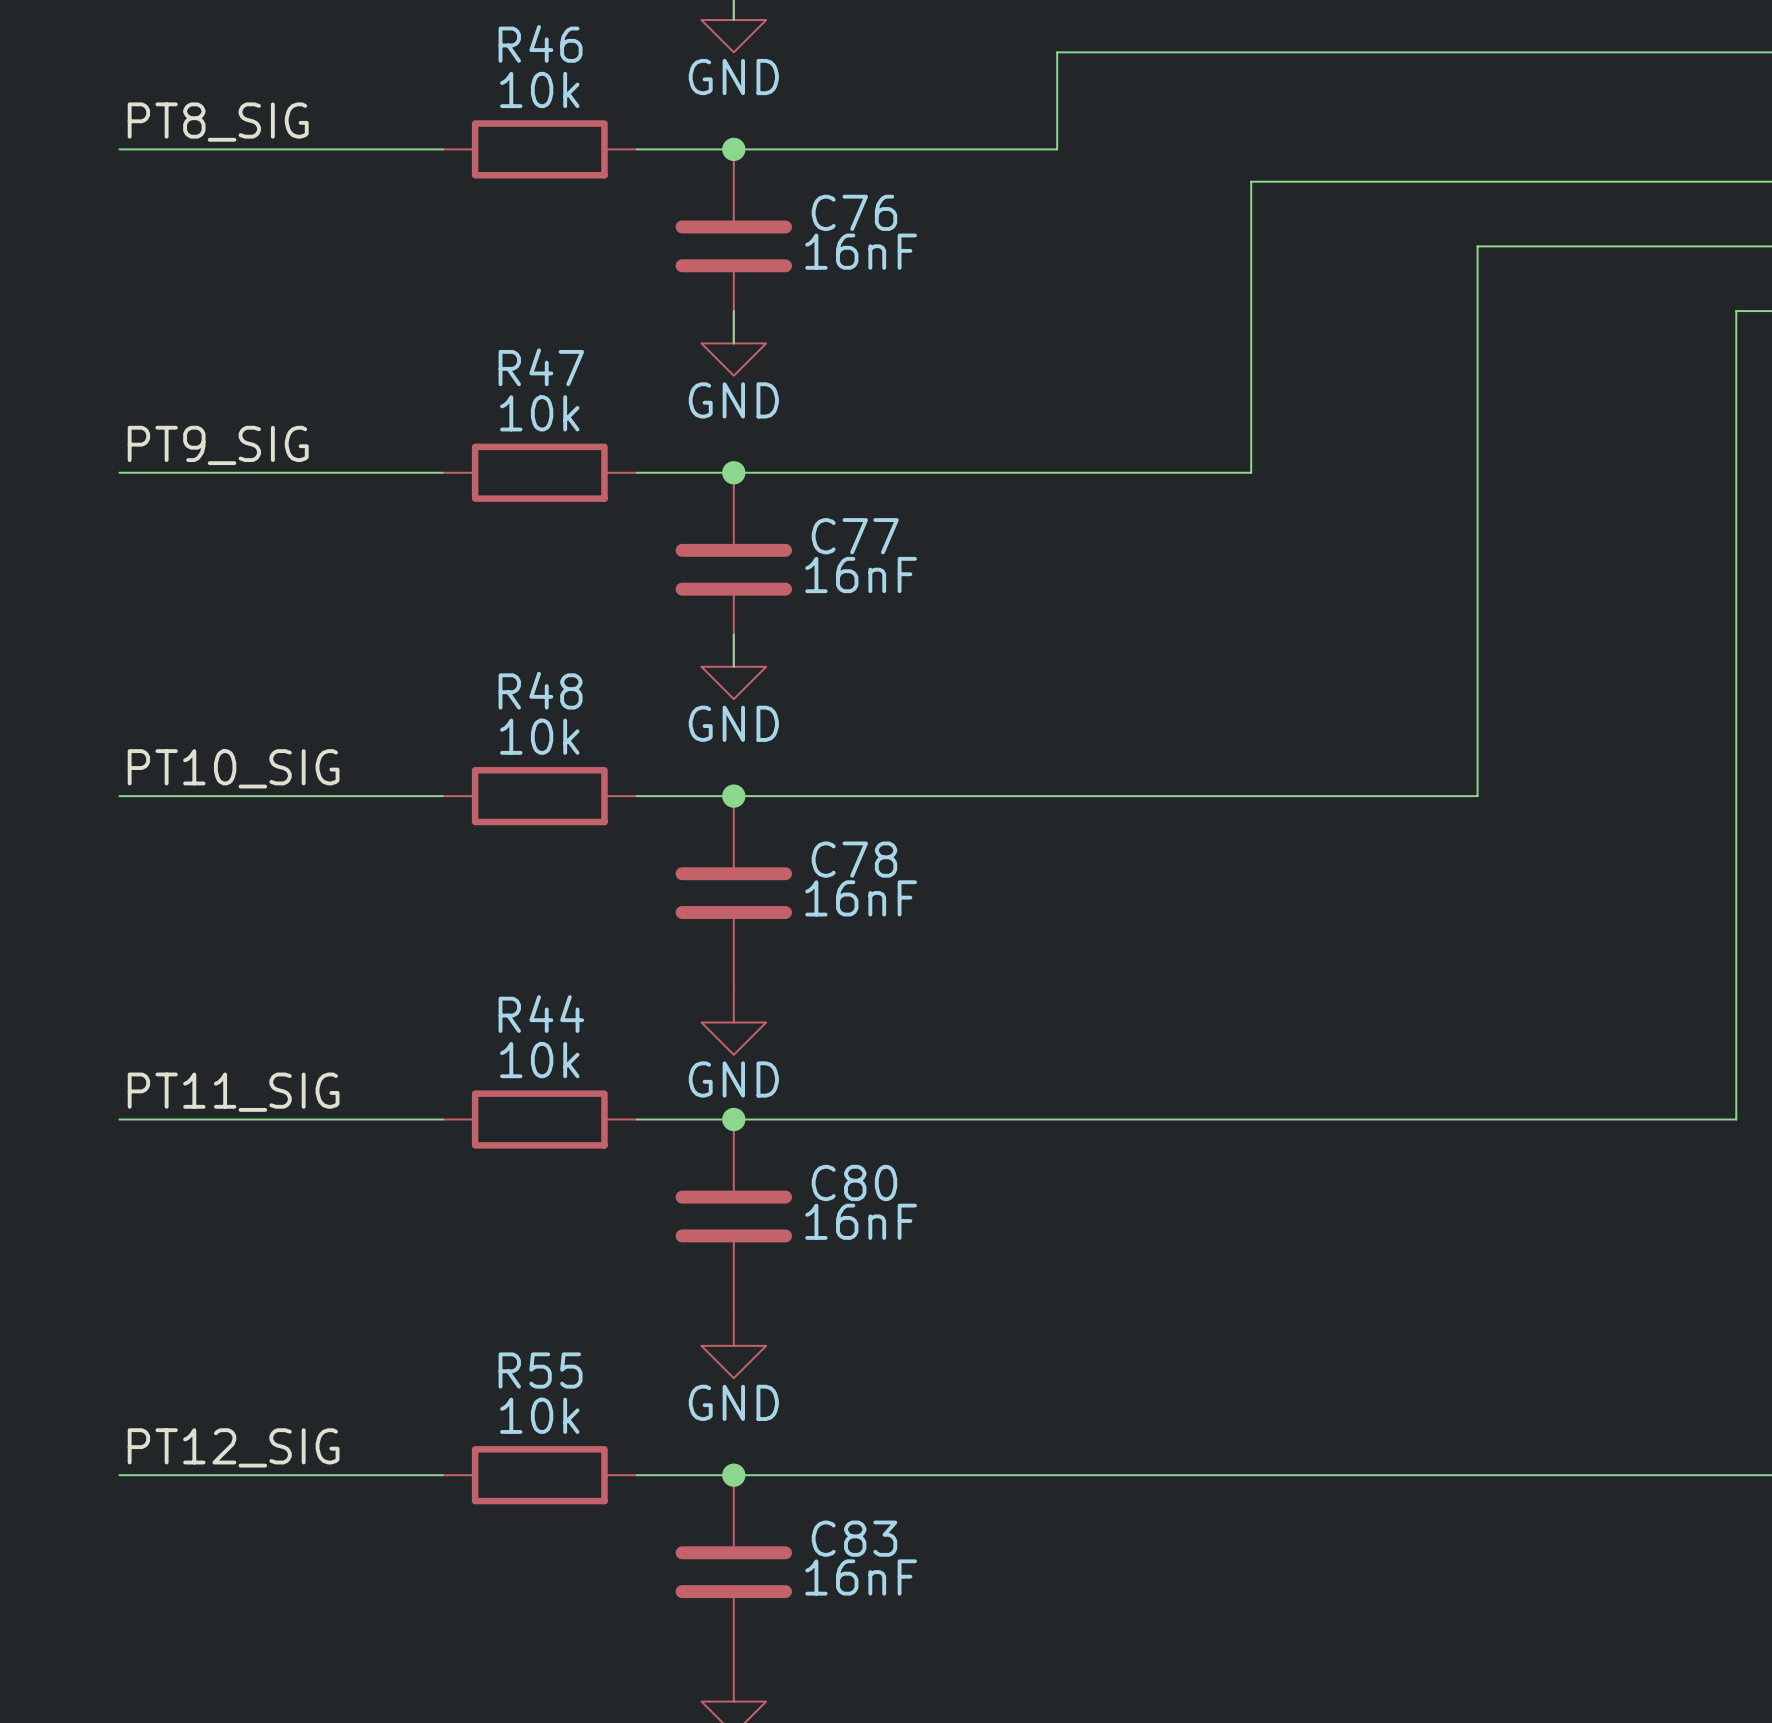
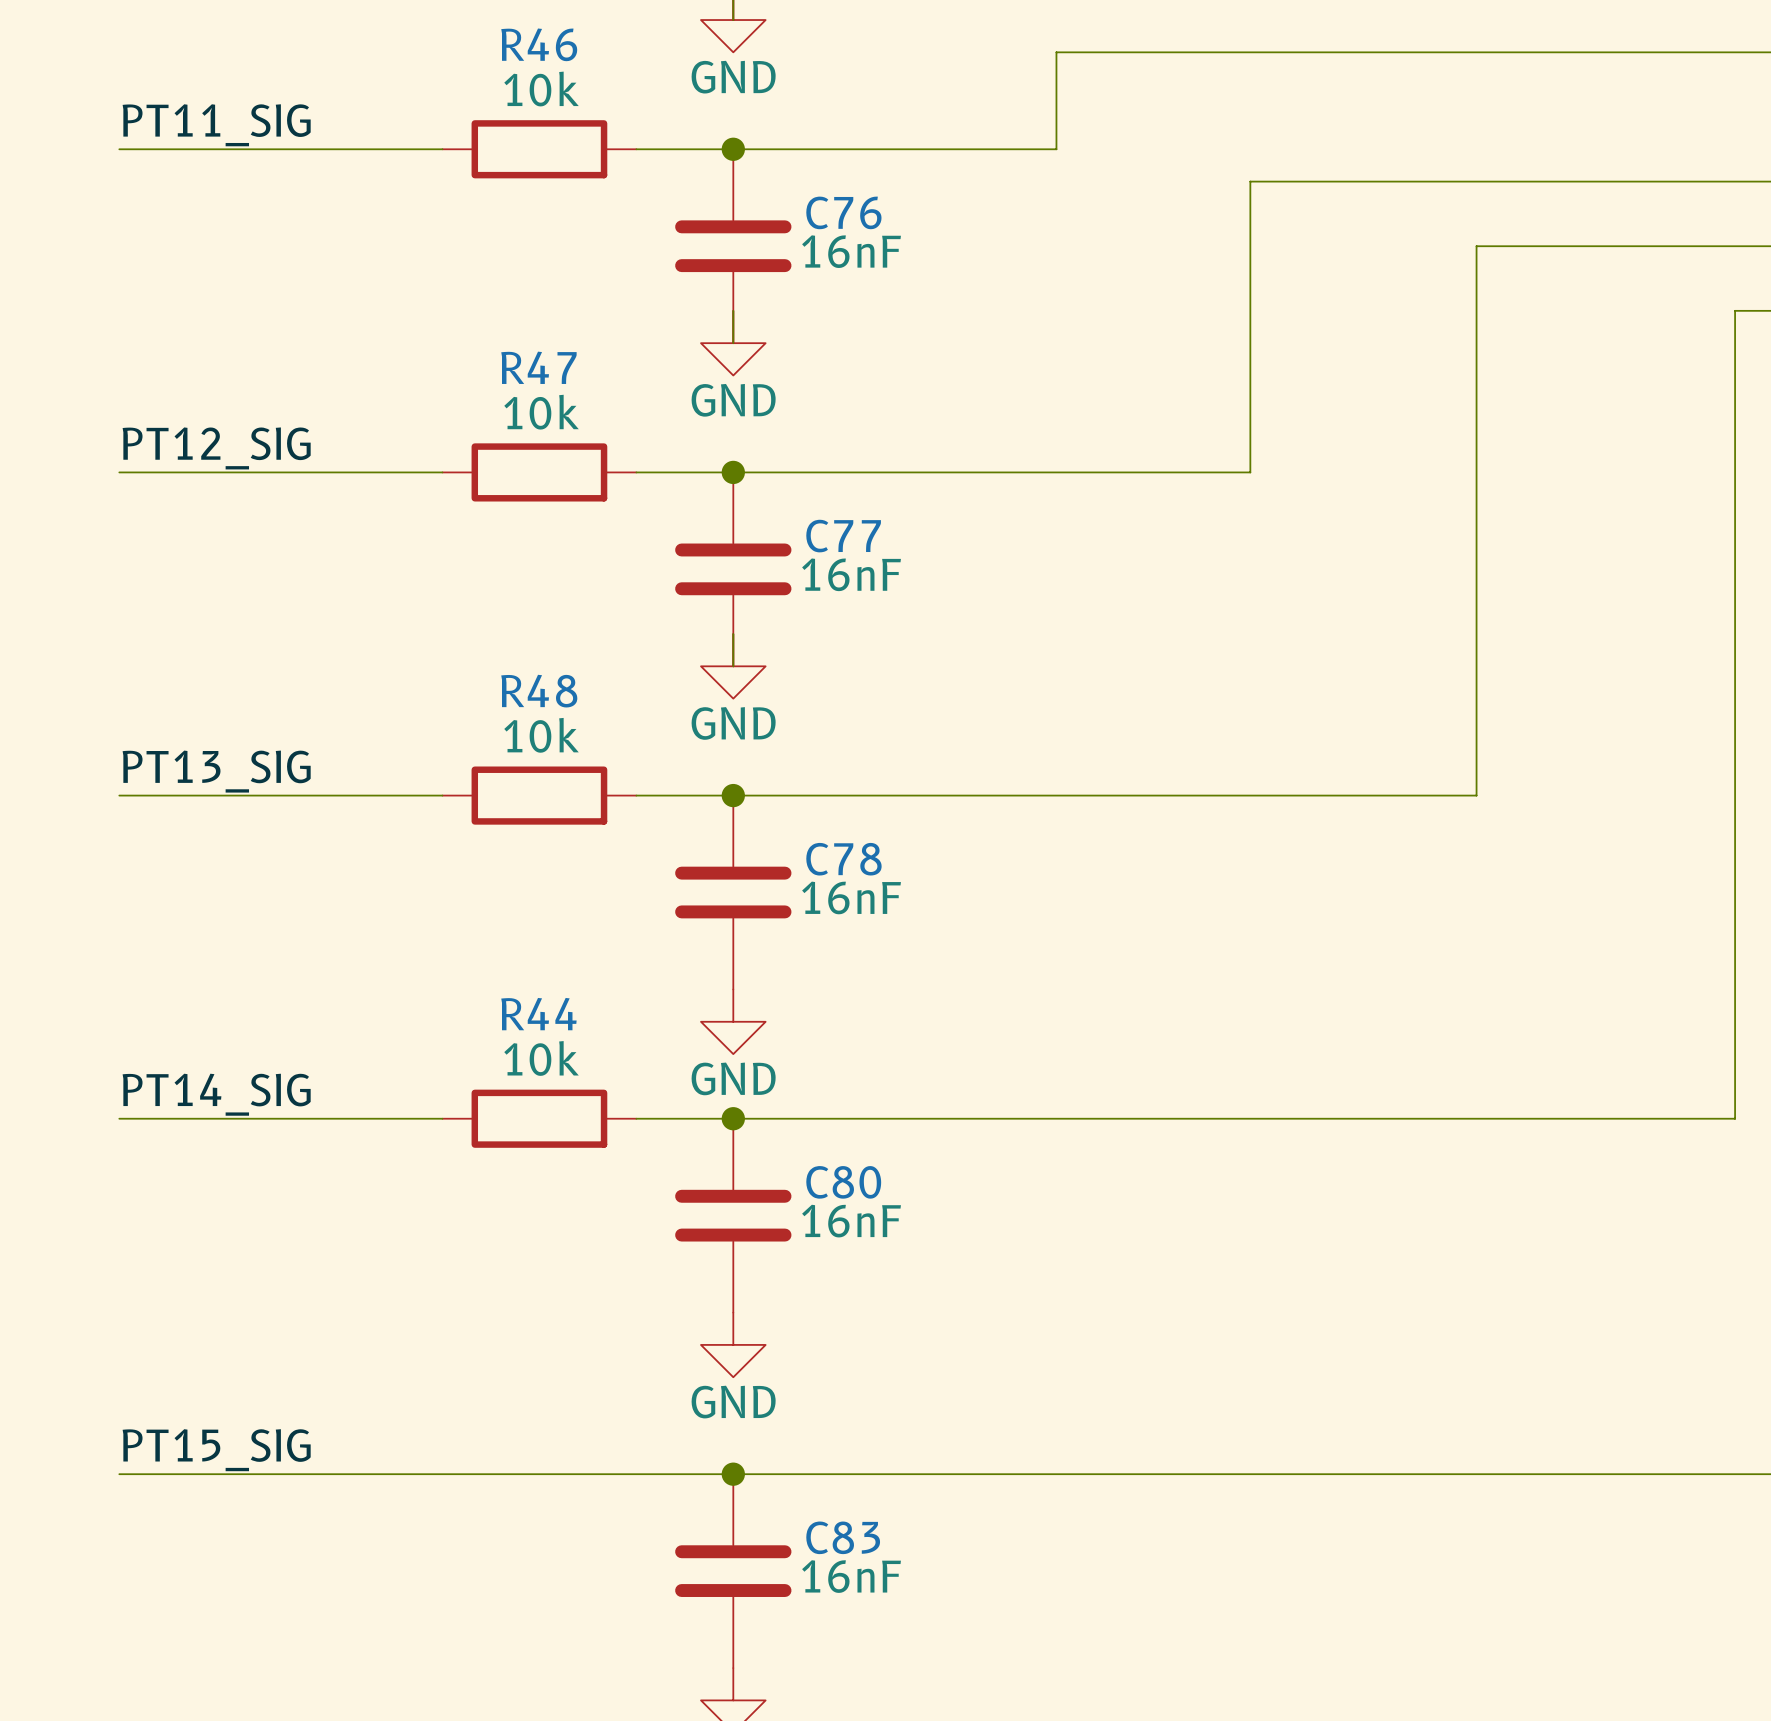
label: PT8_SIG (218, 122) -> PT11_SIG (216, 125)
label: PT9_SIG (218, 445) -> PT12_SIG (216, 448)
label: PT10_SIG (233, 768) -> PT13_SIG (216, 771)
label: PT11_SIG (233, 1092) -> PT14_SIG (216, 1094)
label: PT12_SIG (233, 1447) -> PT15_SIG (216, 1450)
wire: none -> (442, 1474) (636, 1474)
R55: 10k (539, 1475) -> none

